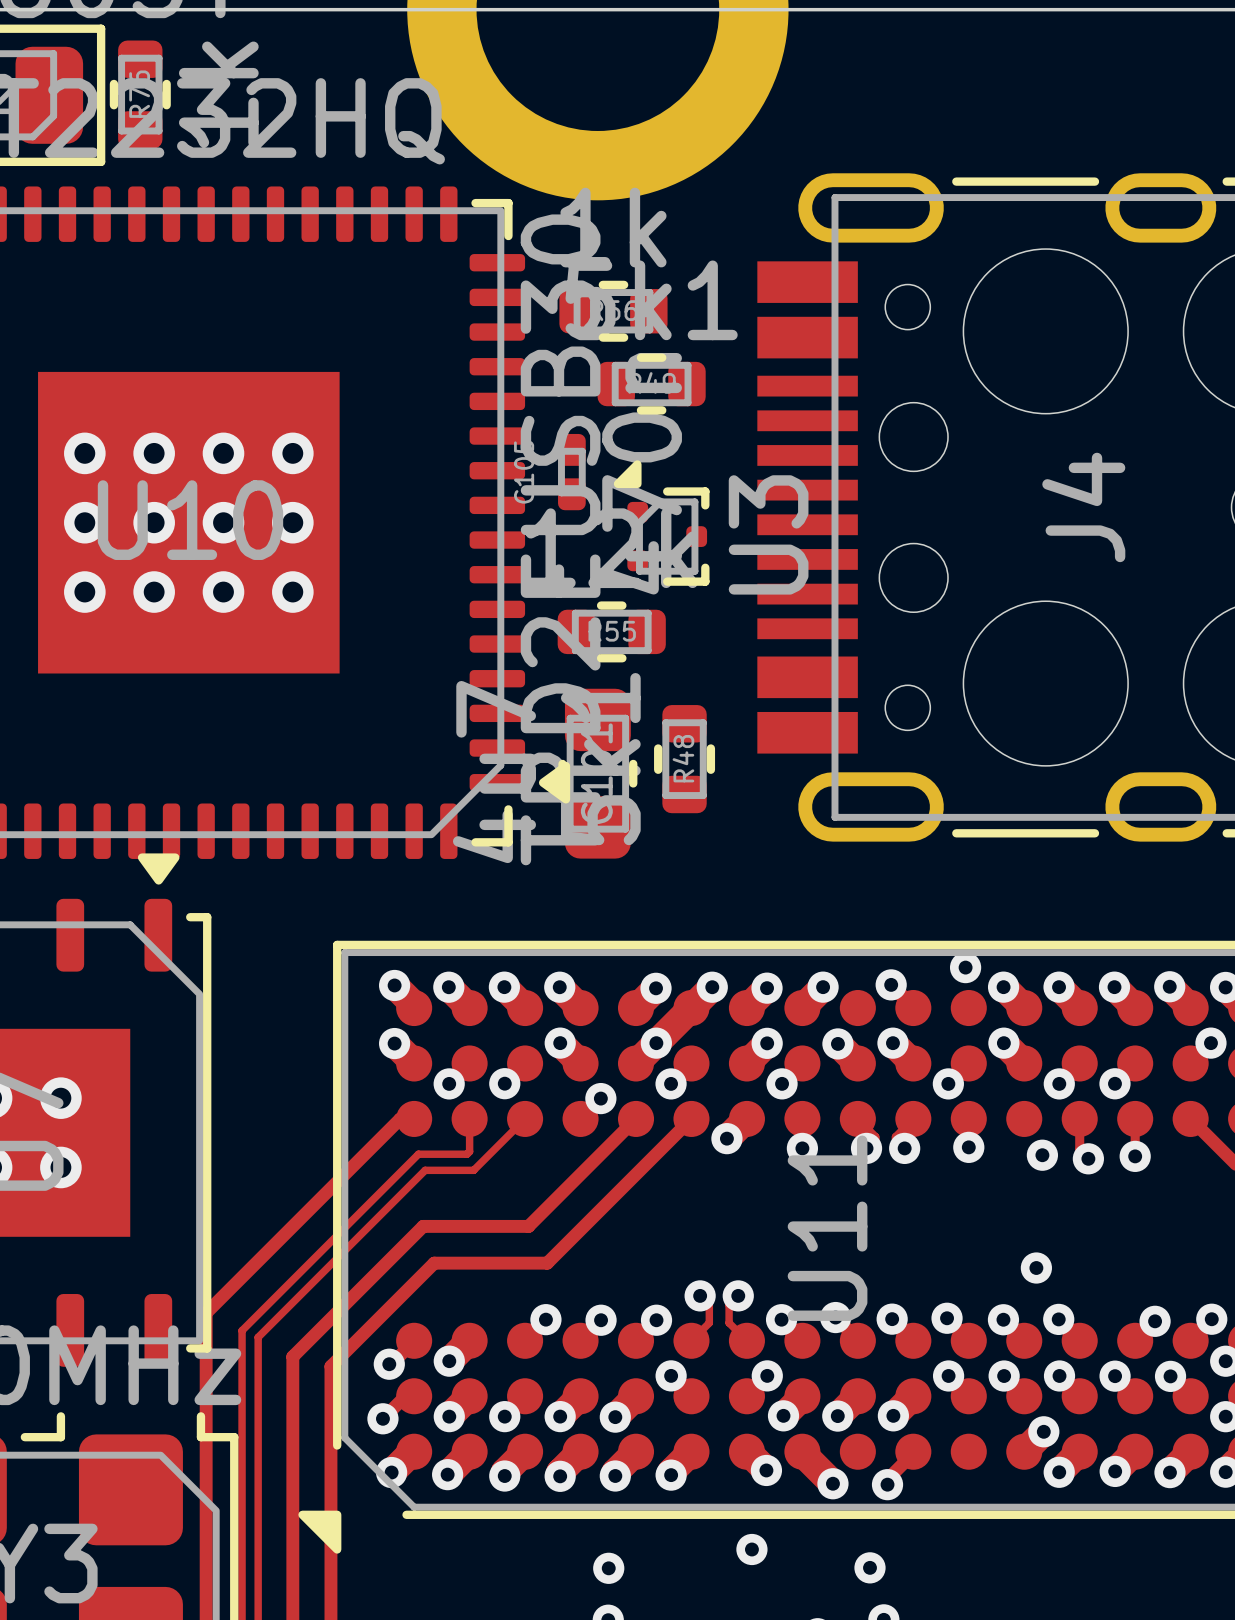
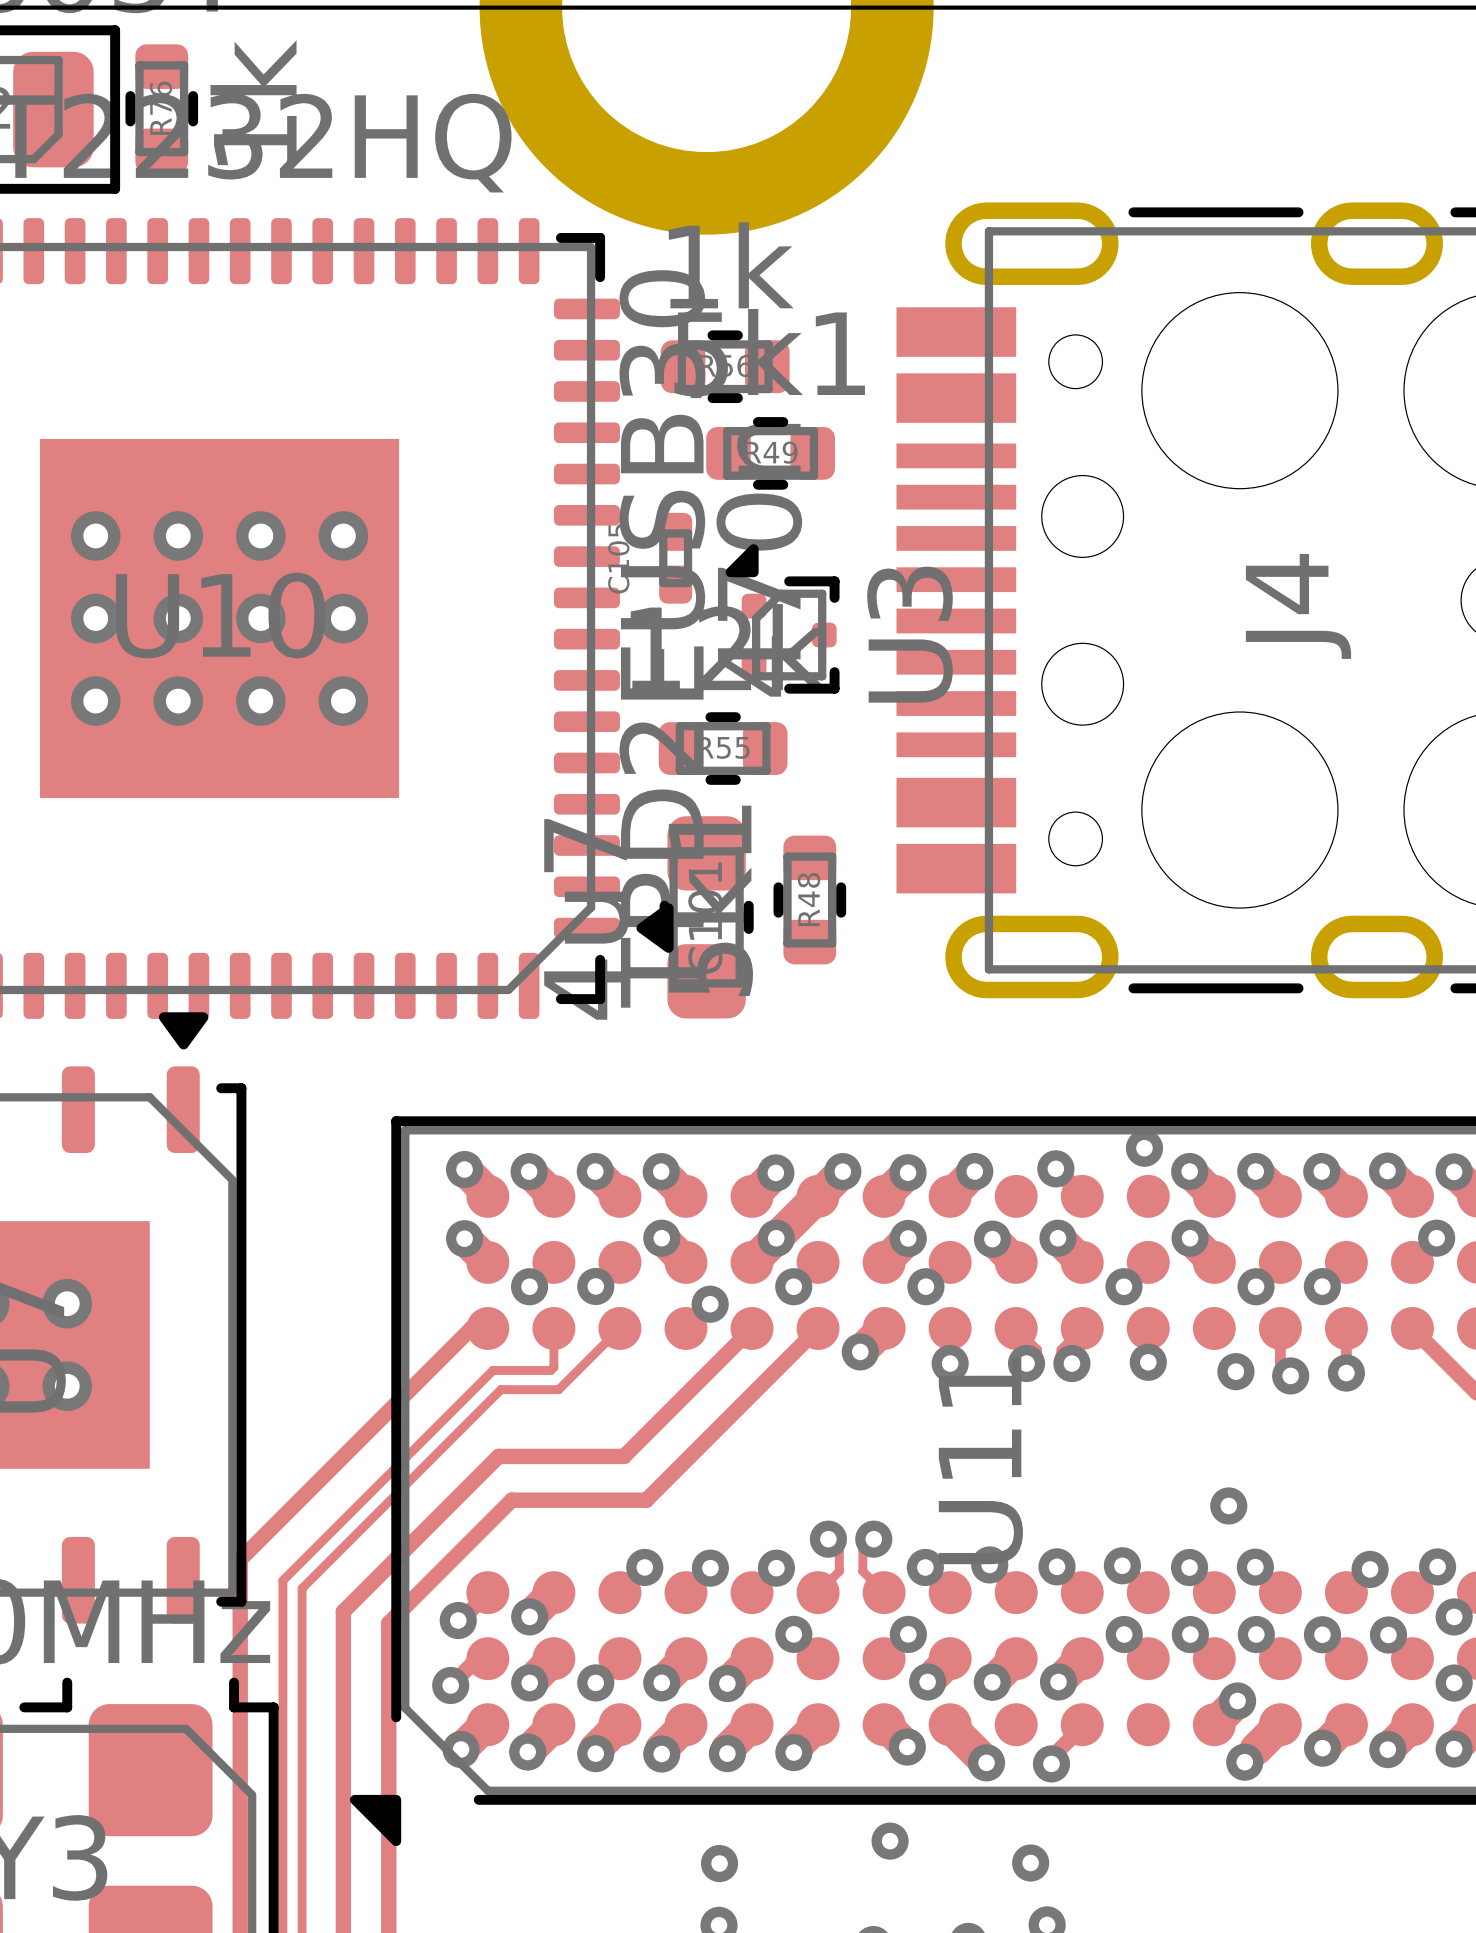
via position: (1059, 1472) -> (1244, 1762)

